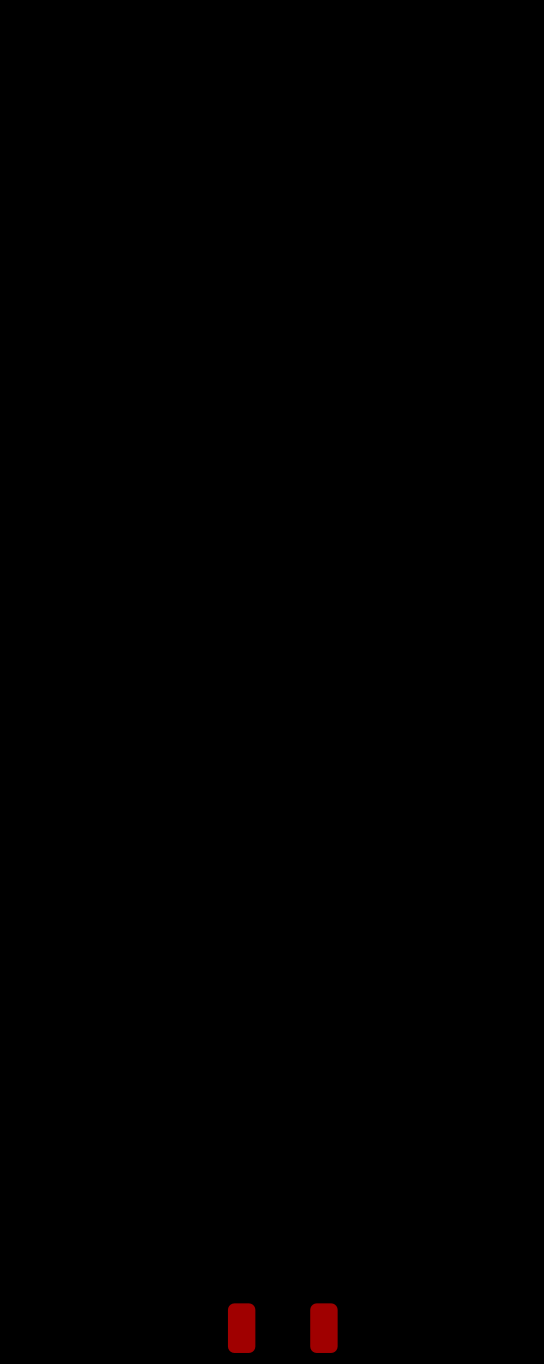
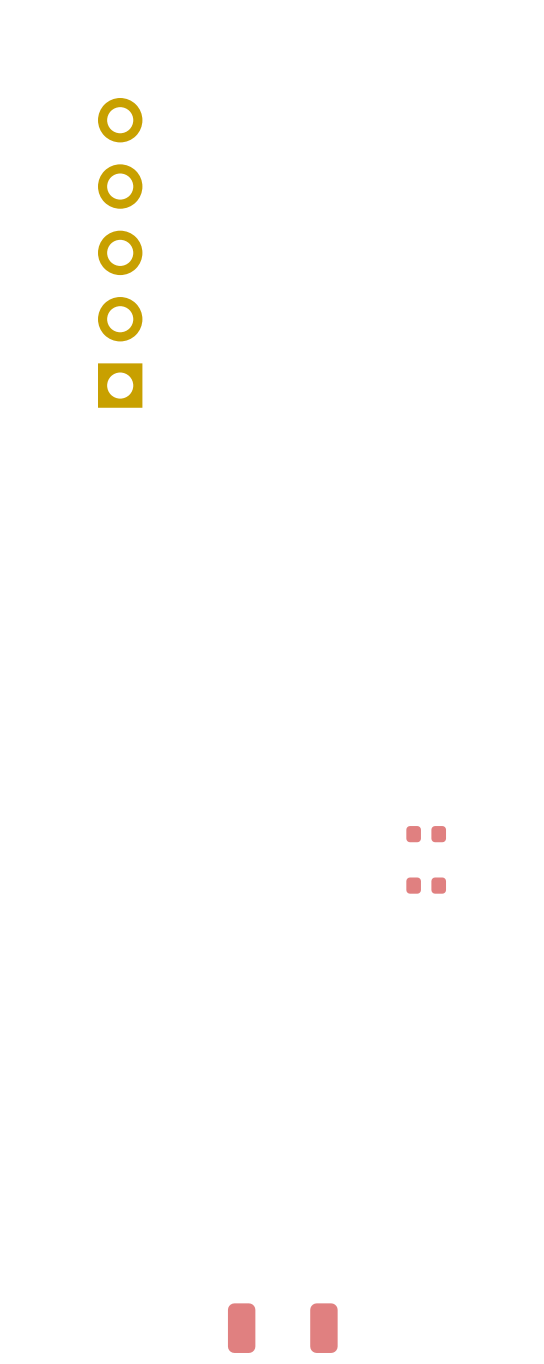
part: none -> (120, 252)
part: none -> (426, 834)
part: none -> (426, 885)

